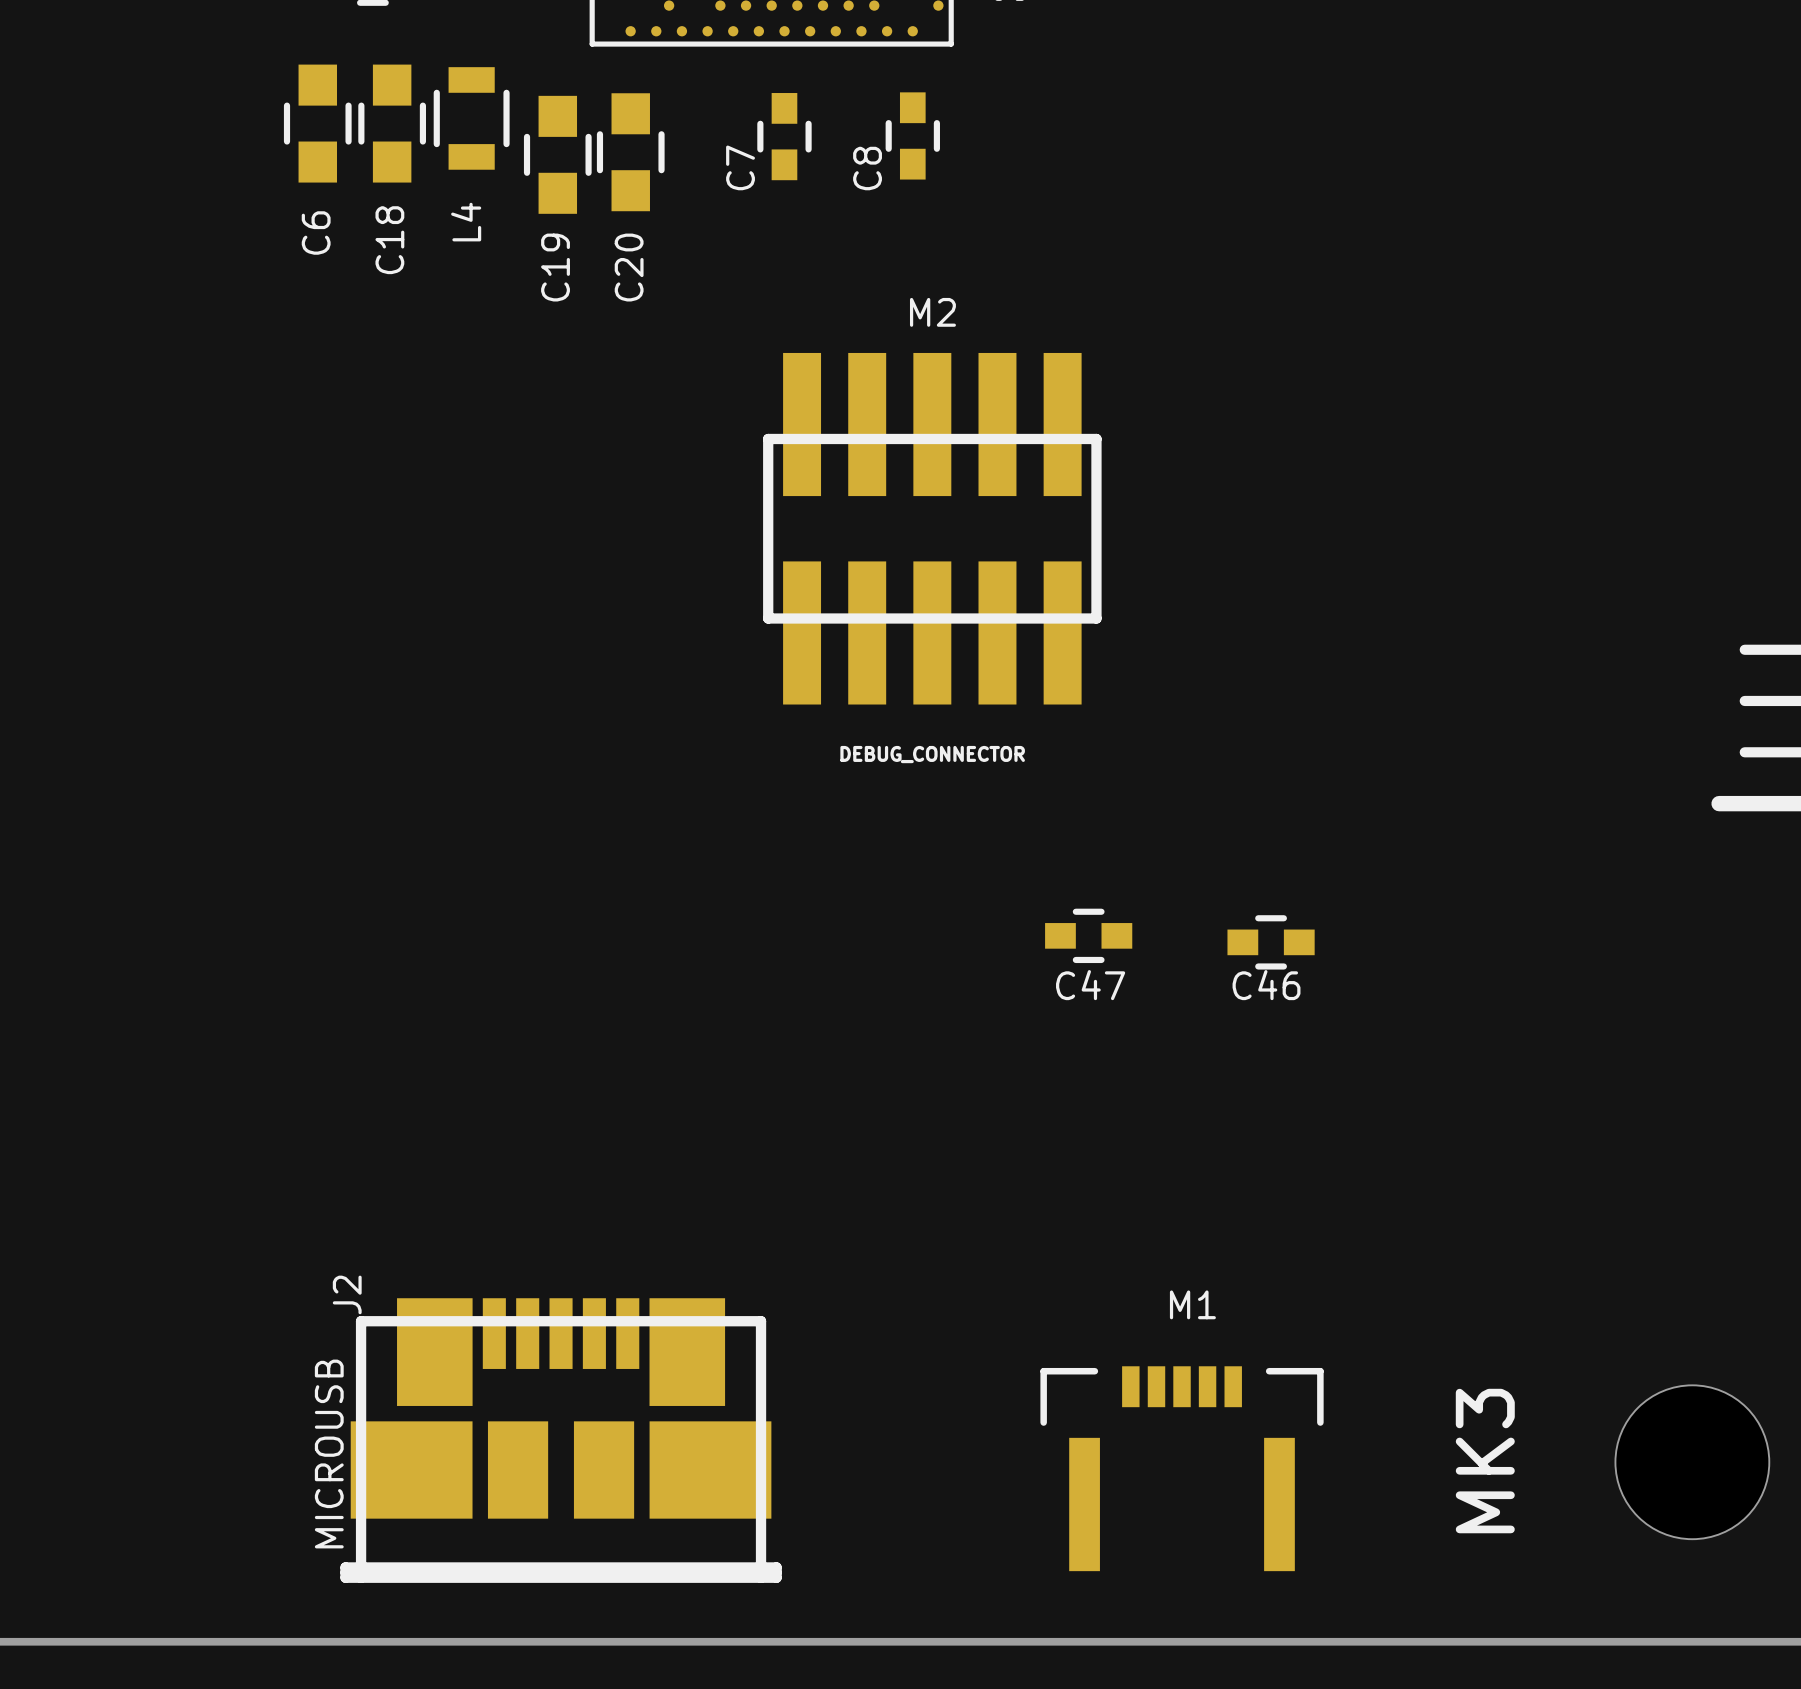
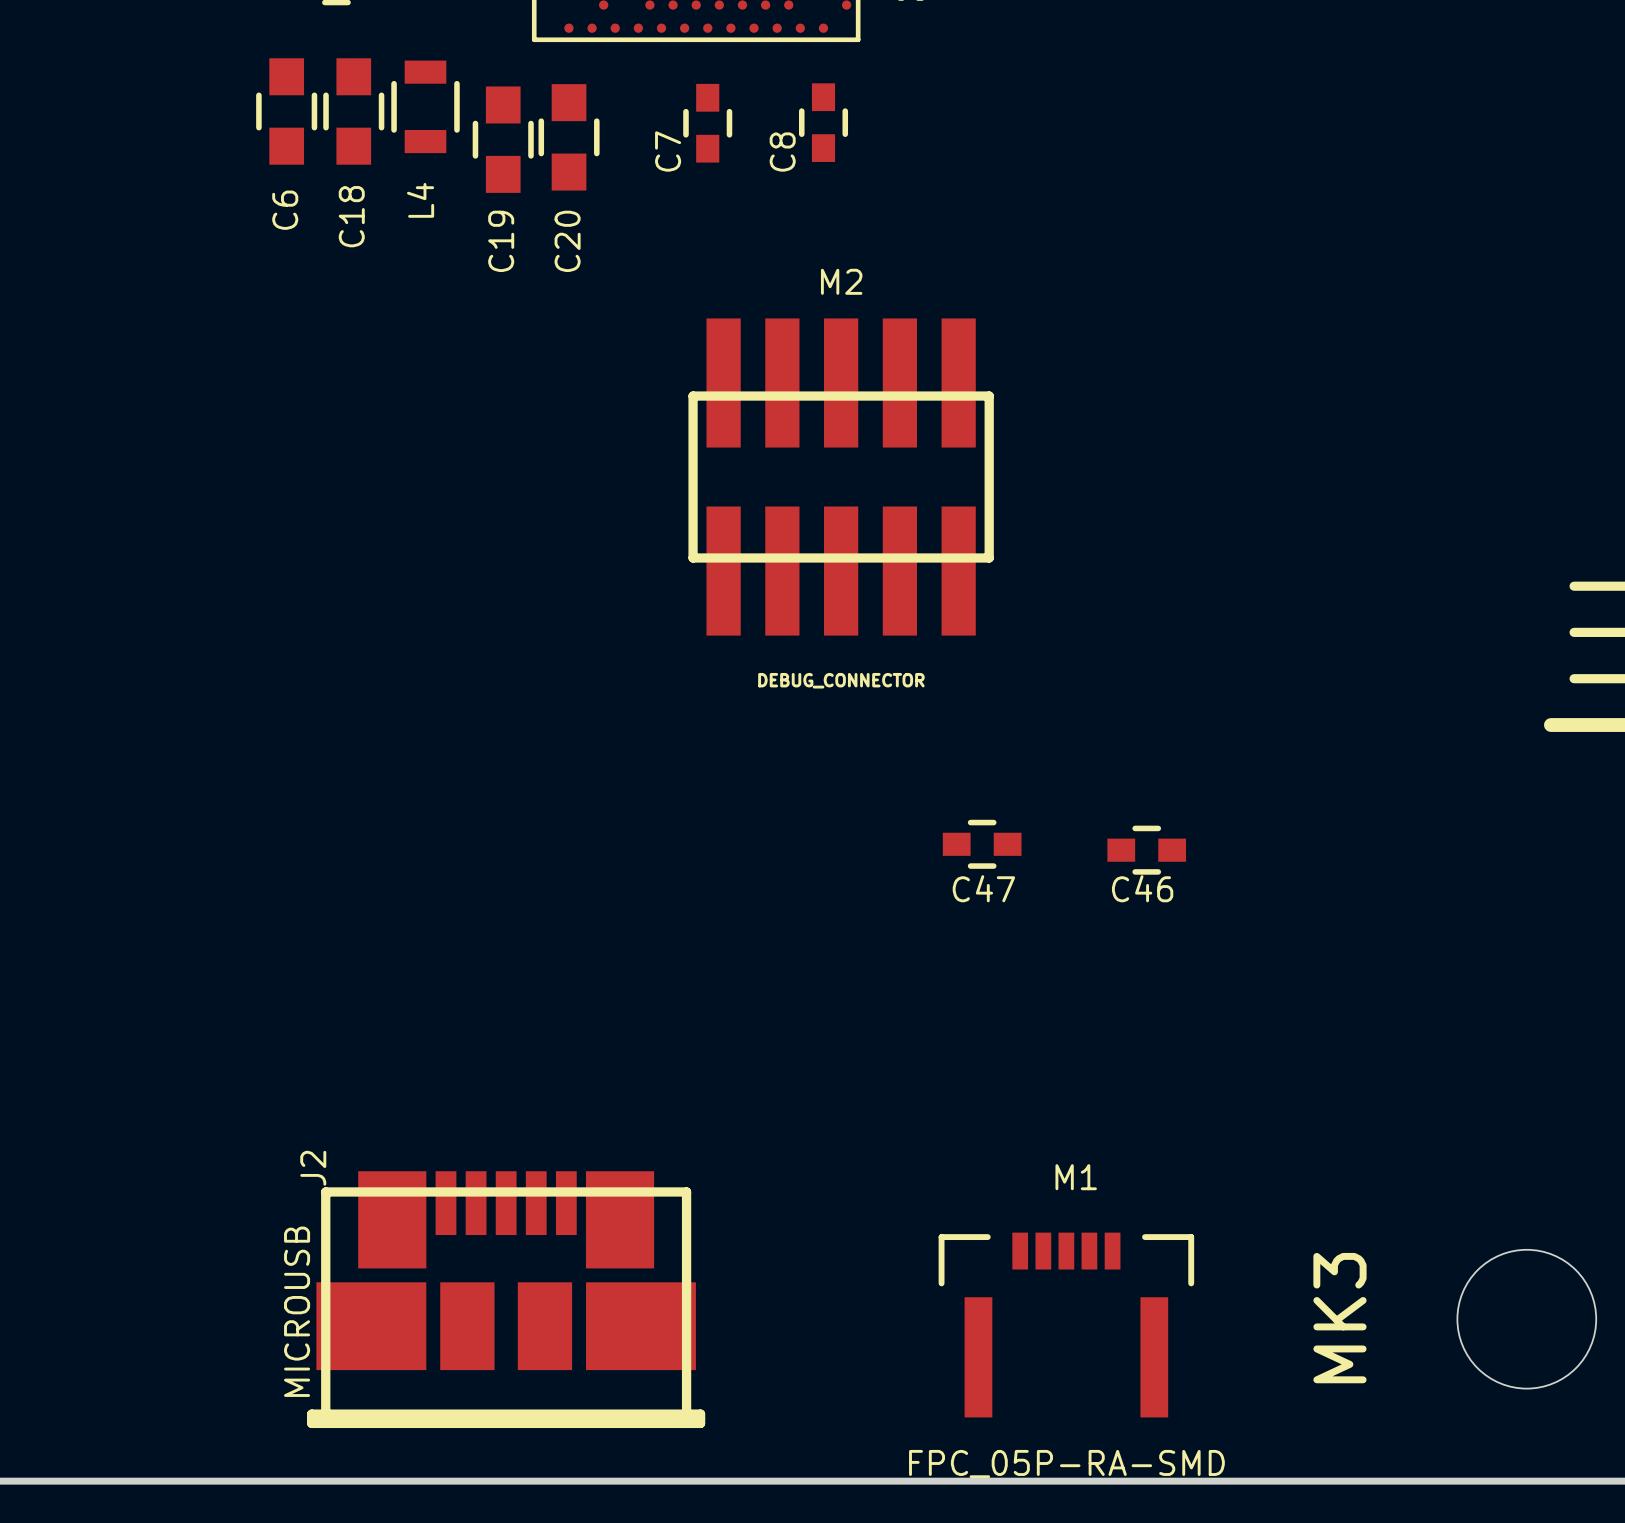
M1 value: none -> FPC_05P-RA-SMD (1066, 1464)

